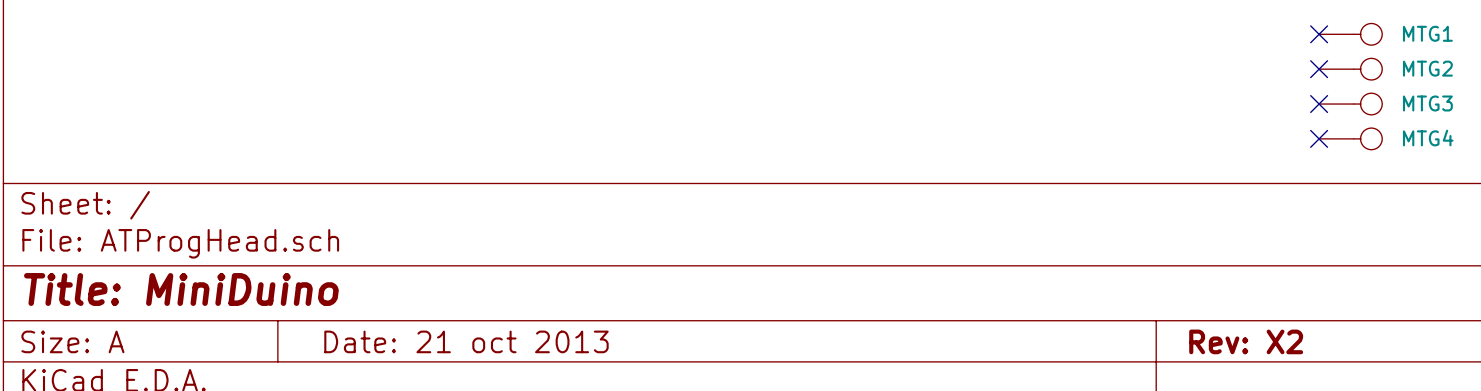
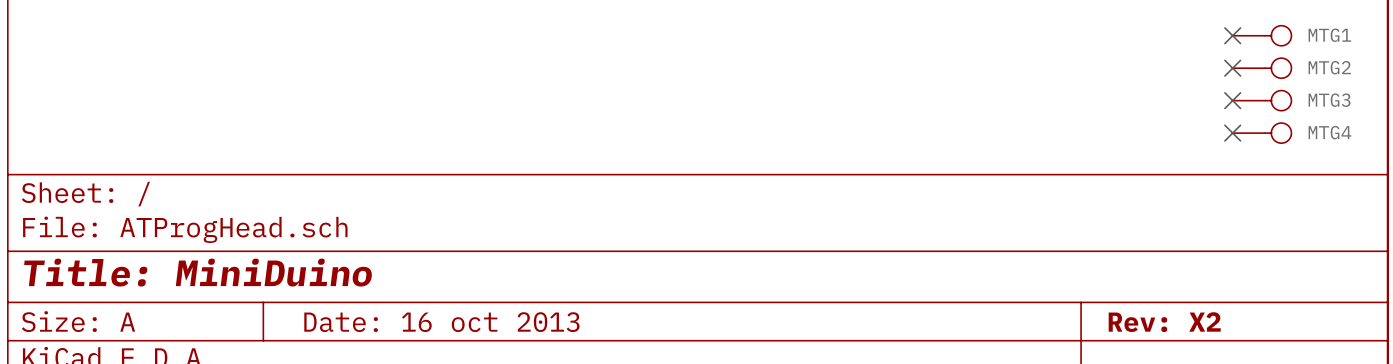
title block: Date: 21 oct 2013 (466, 341) -> Date: 16 oct 2013 (441, 322)

